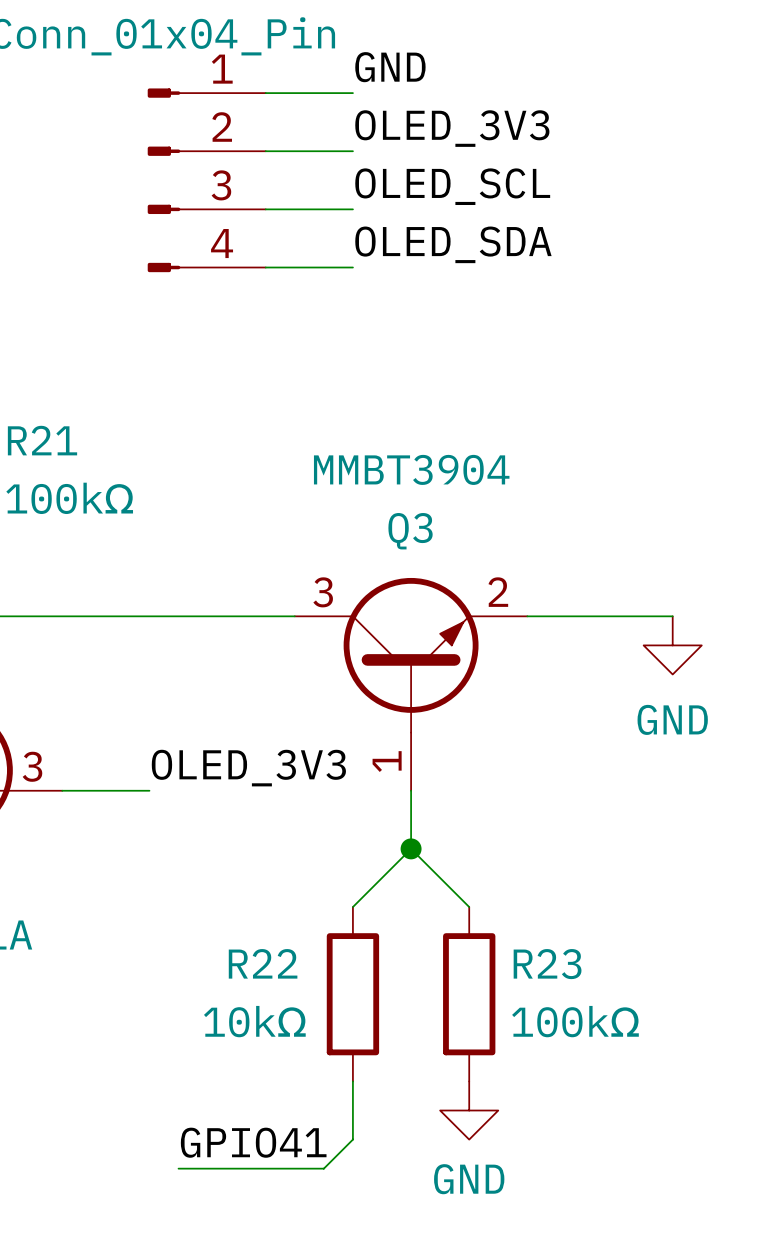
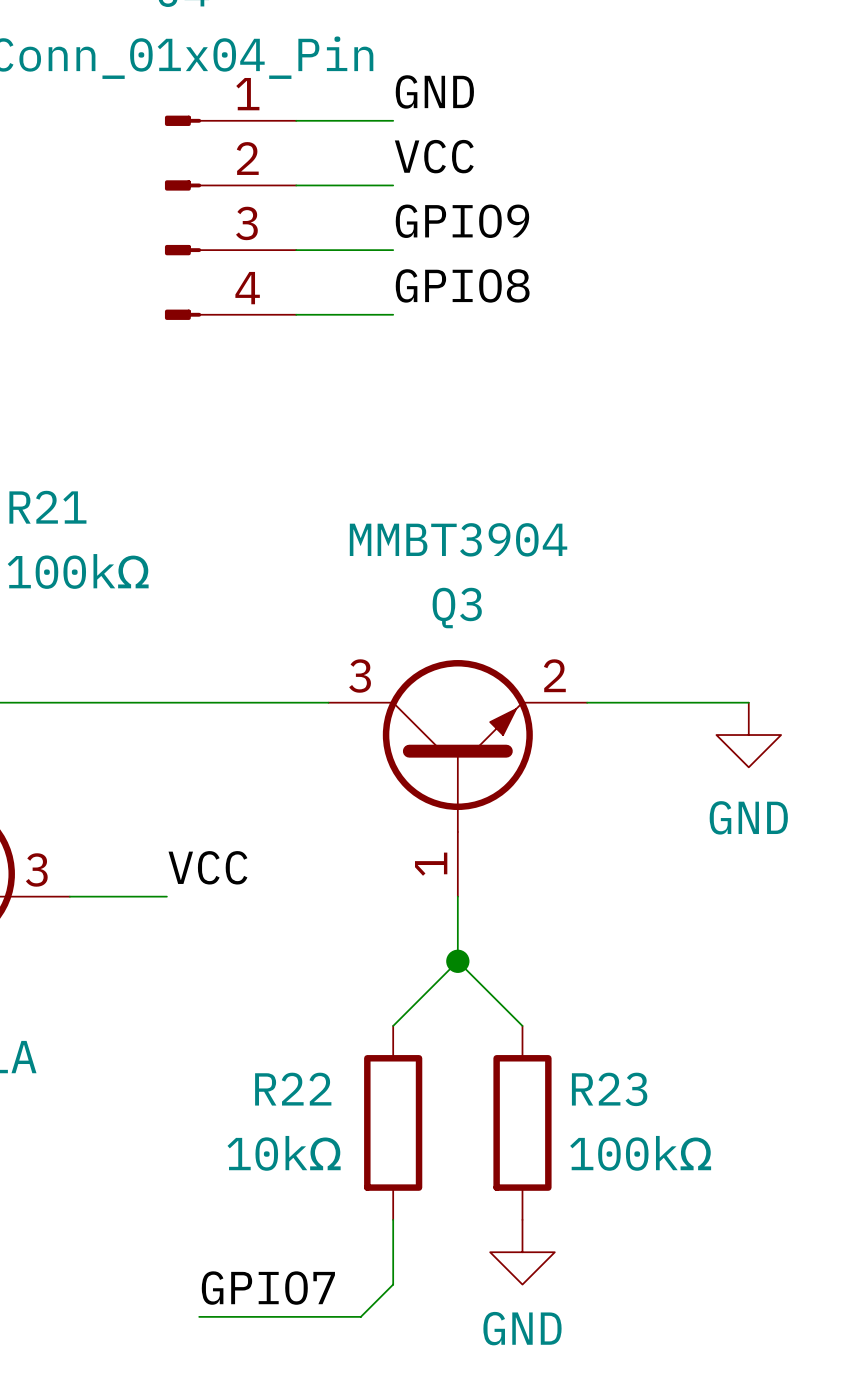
label: OLED_3V3 (452, 128) -> VCC (434, 156)
label: OLED_SCL (452, 186) -> GPIO9 (462, 221)
label: OLED_SDA (453, 244) -> GPIO8 (462, 285)
label: OLED_3V3 (248, 768) -> VCC (207, 867)
label: GPIO41 (253, 1142) -> GPIO7 (268, 1288)

